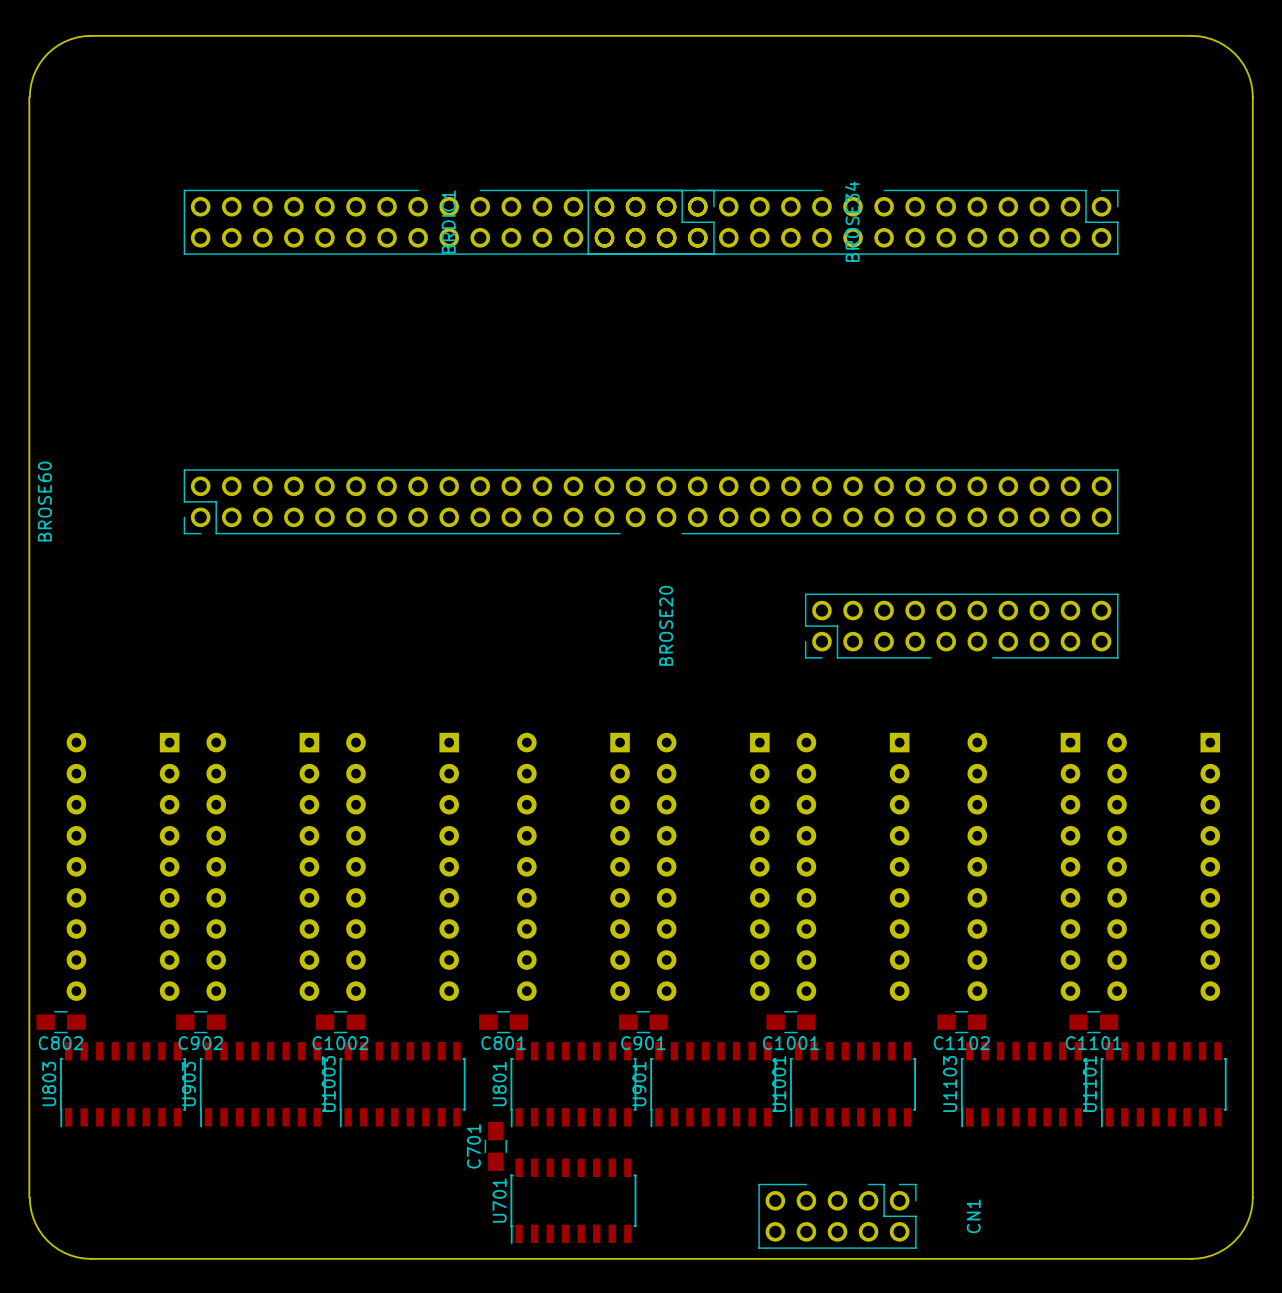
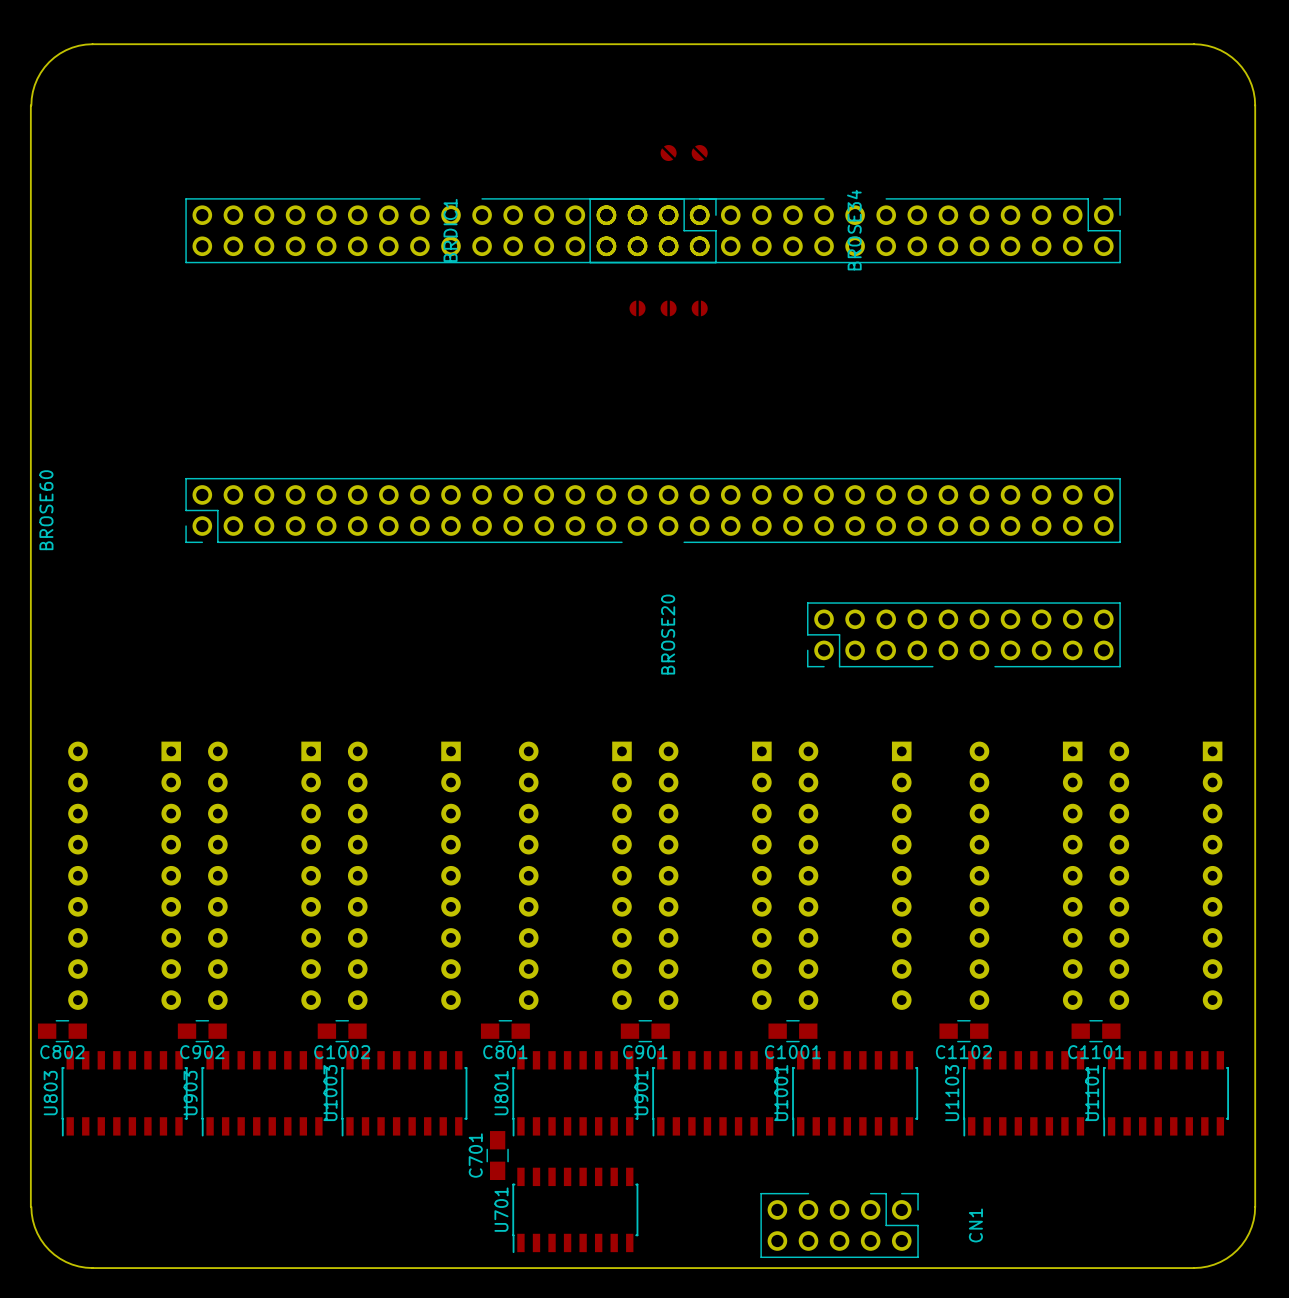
part: none -> (668, 153)
part: none -> (699, 153)
part: none -> (637, 308)
part: none -> (668, 308)
part: none -> (699, 308)

